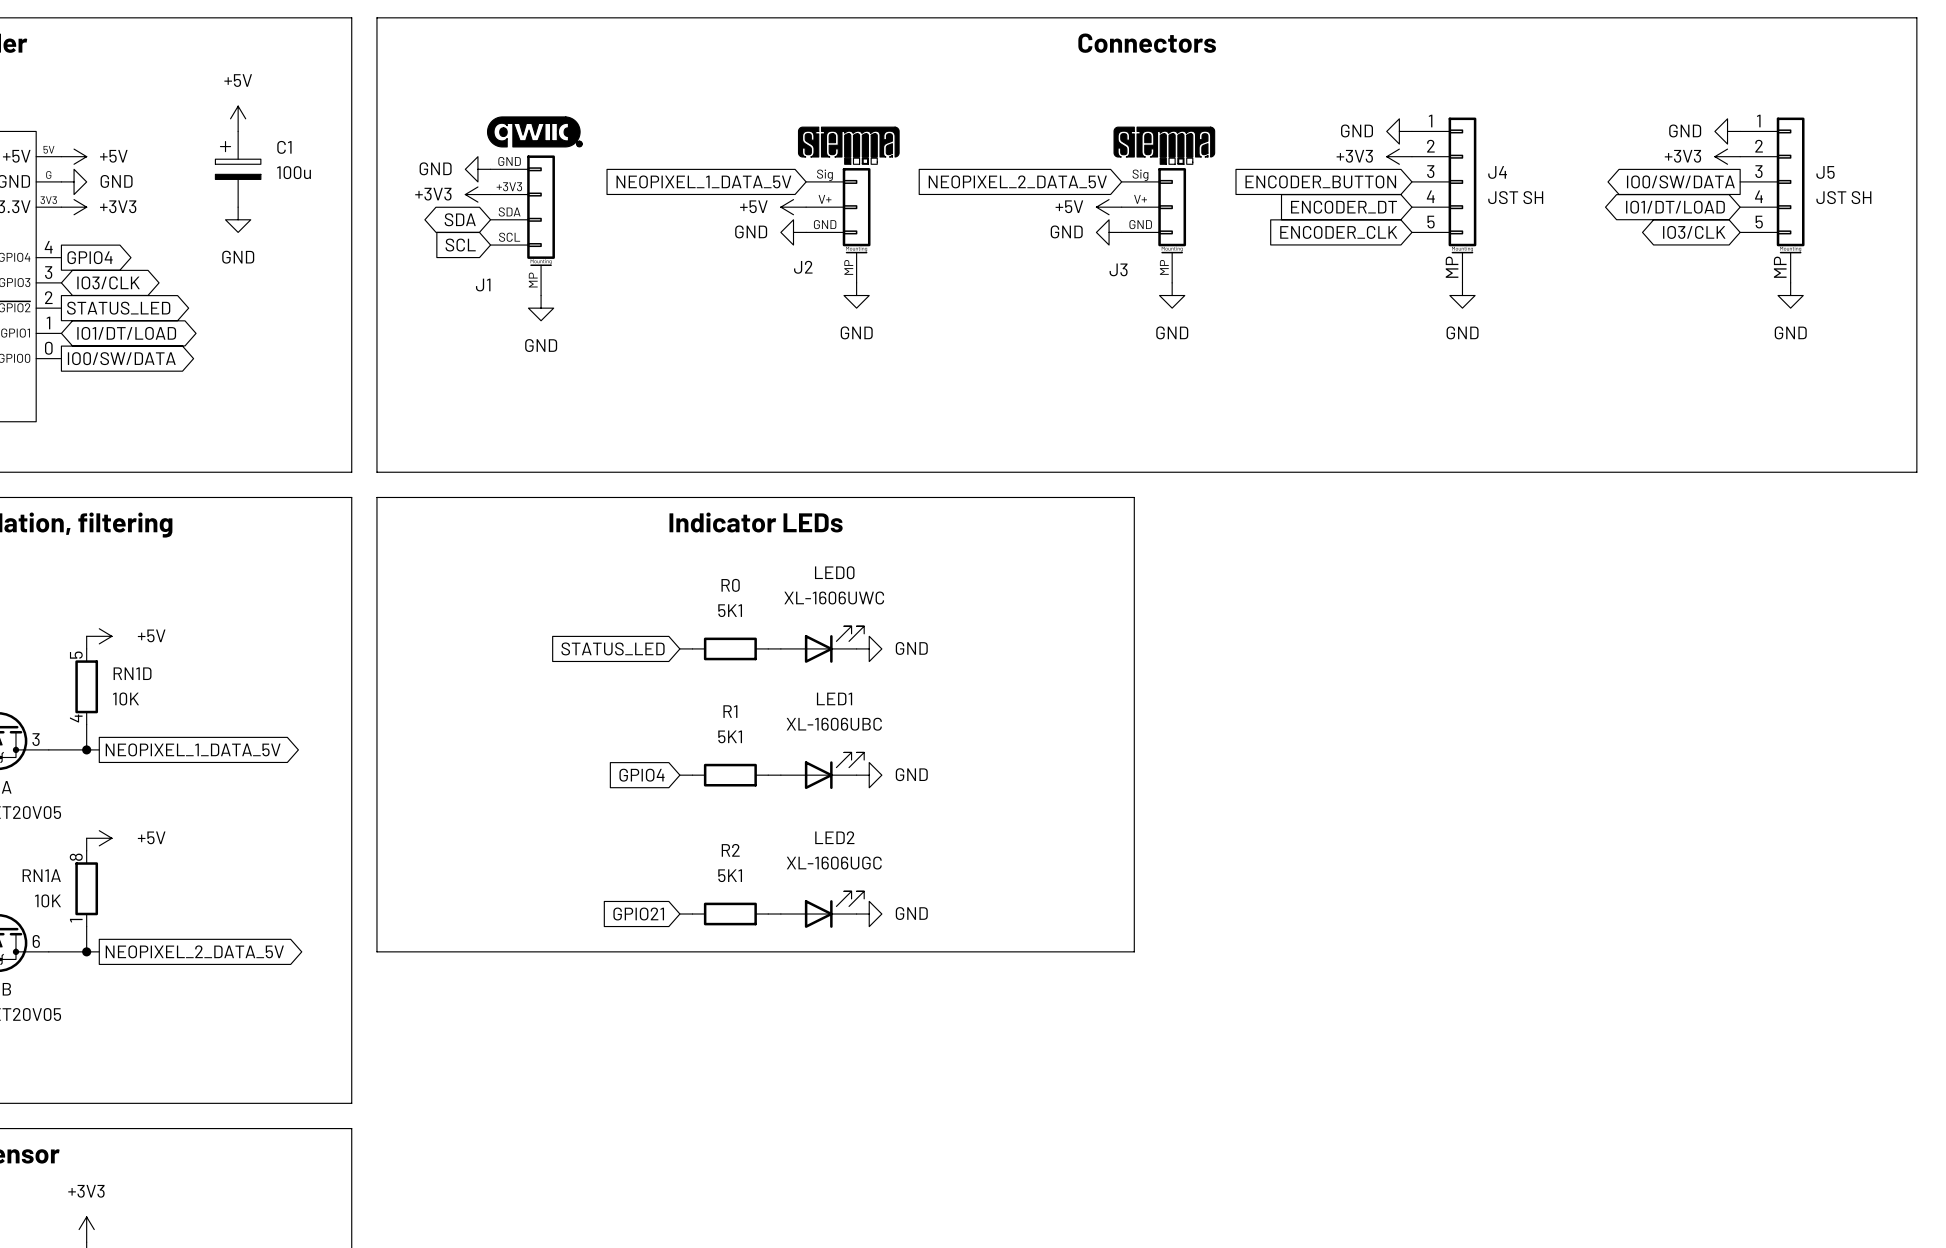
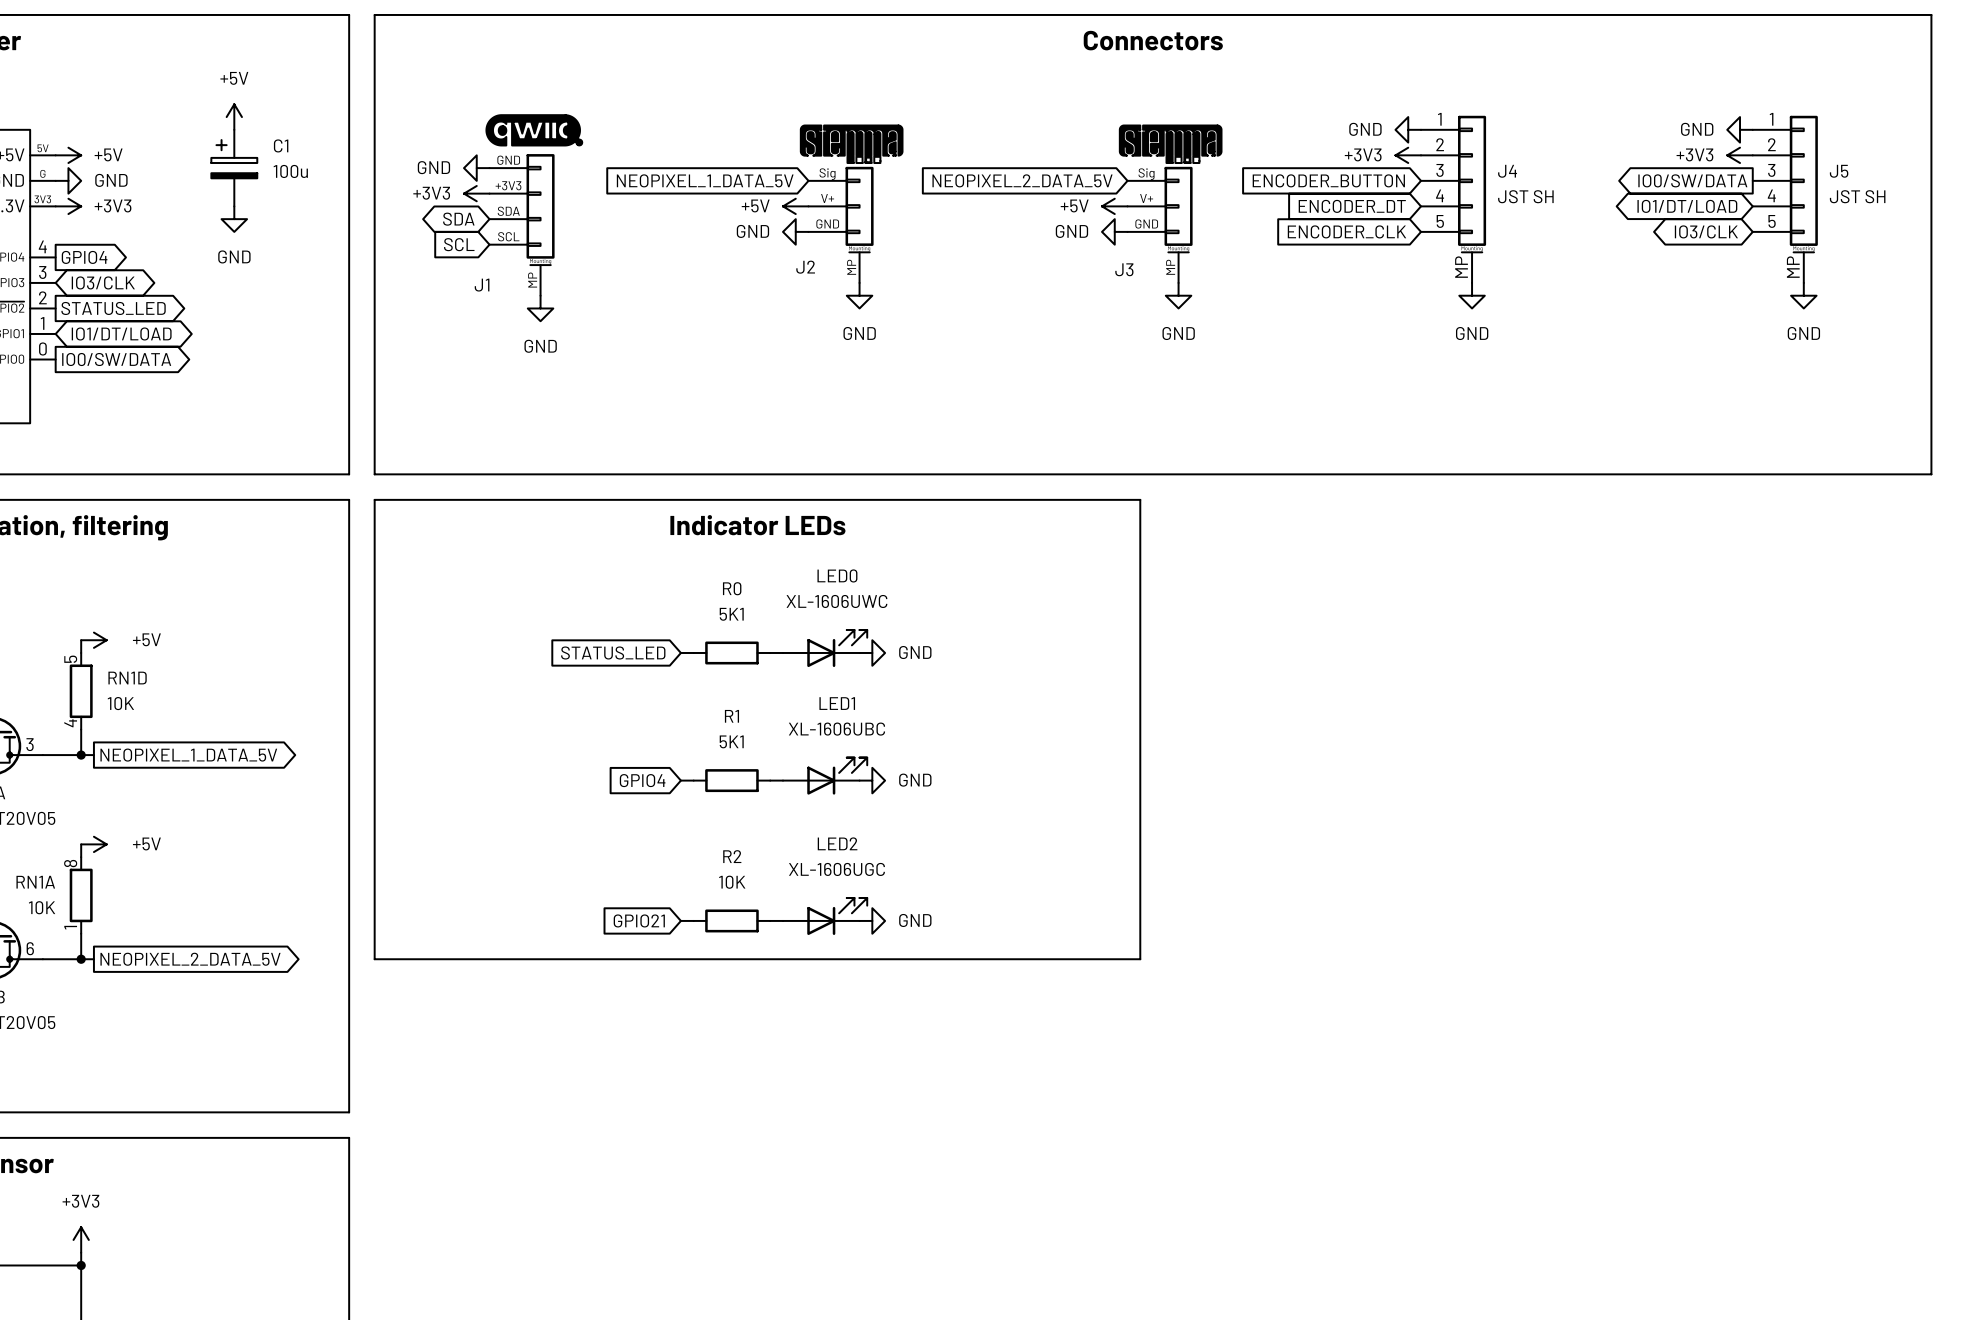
R2 value: 5K1 (730, 875) -> 10K (732, 882)

